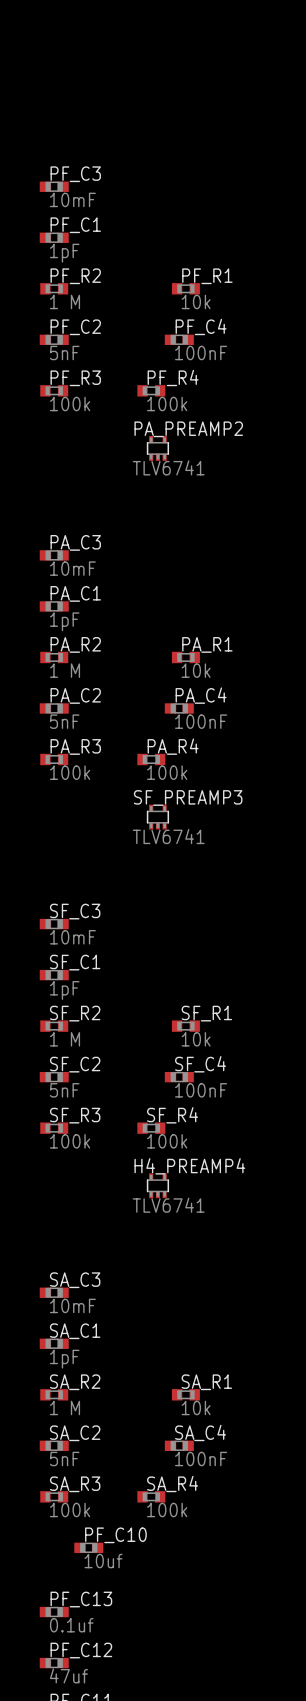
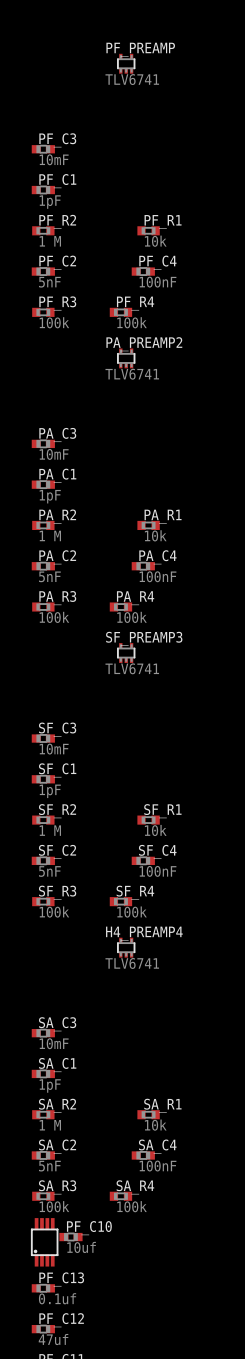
PF_PREAMP: none -> TLV6741 (126, 63)
part: none -> (44, 1242)

